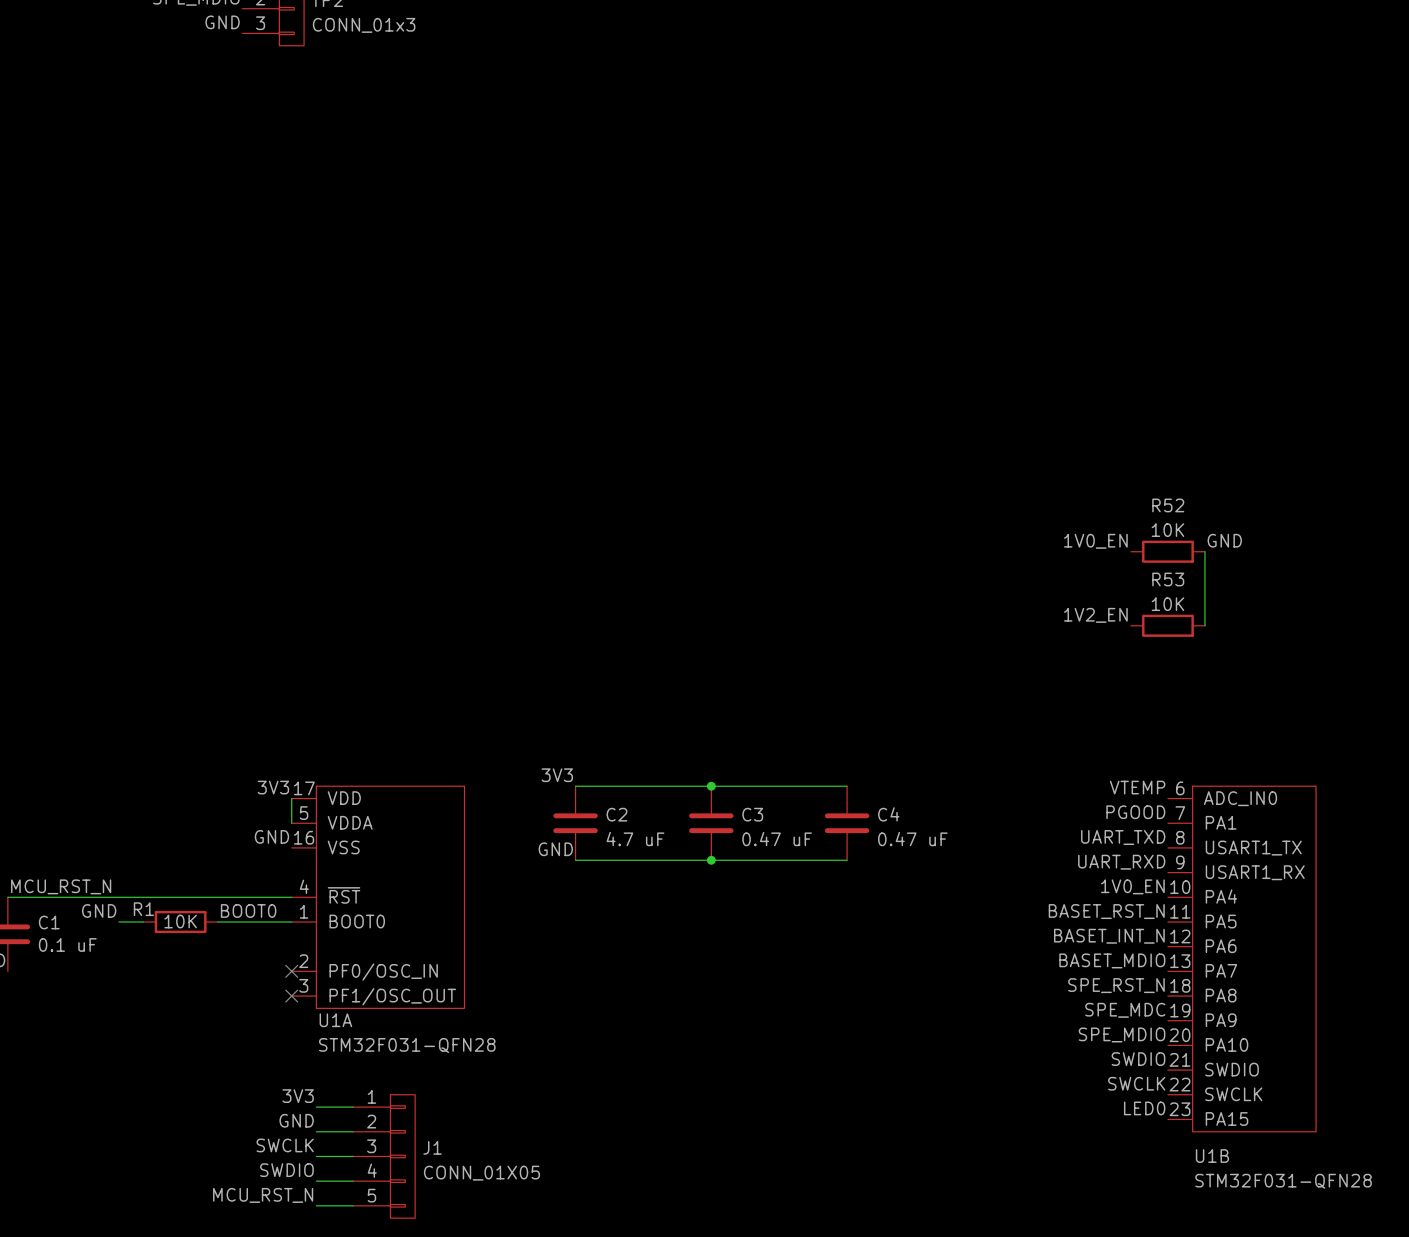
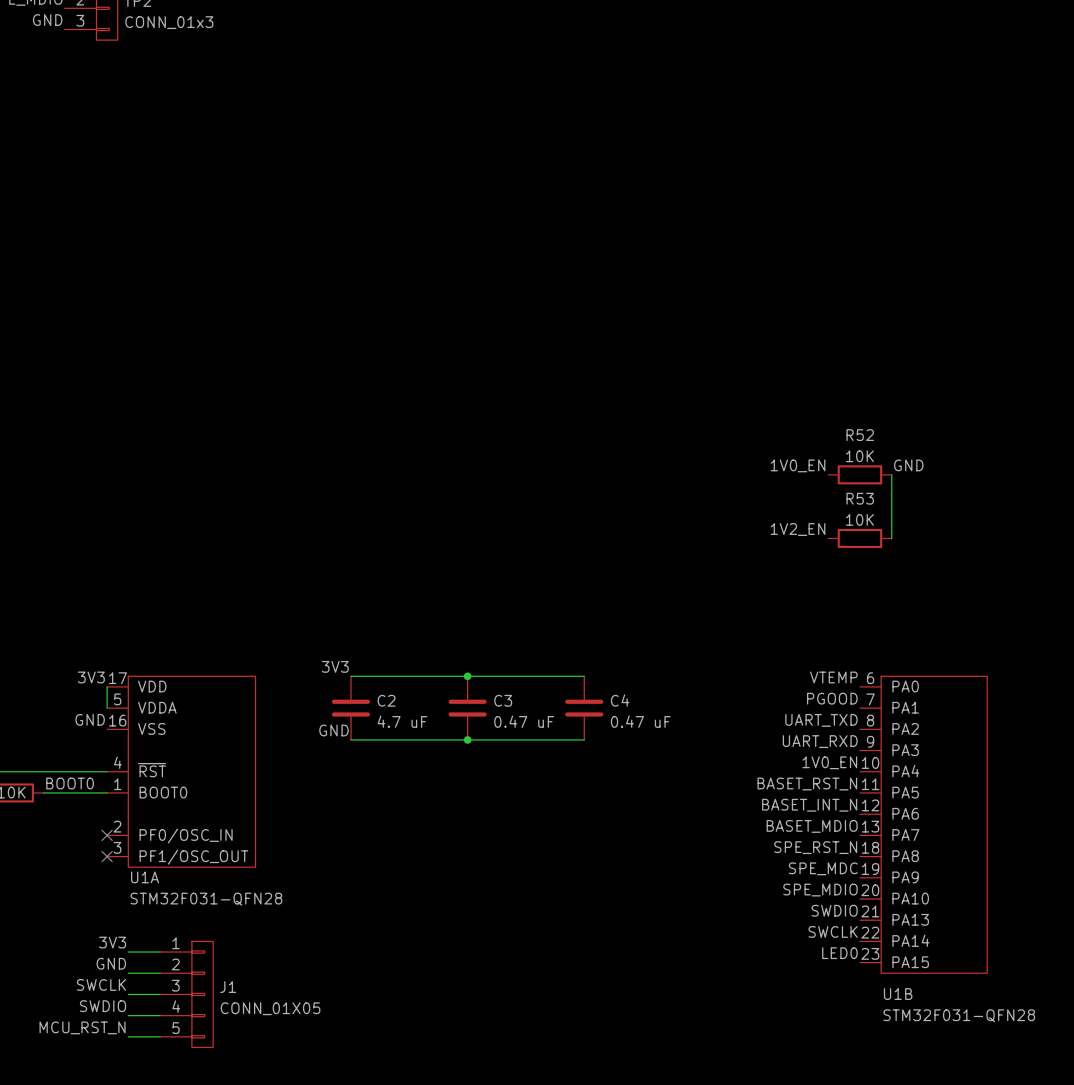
U1B pin name: ADC_IN0 (1240, 798) -> PA0 (905, 686)
U1B pin name: USART1_TX (1253, 848) -> PA2 (905, 728)
U1B pin name: USART1_RX (1255, 872) -> PA3 (905, 750)
U1B pin name: SWDIO (1231, 1069) -> PA13 (910, 919)
U1B pin name: SWCLK (1233, 1094) -> PA14 (910, 940)

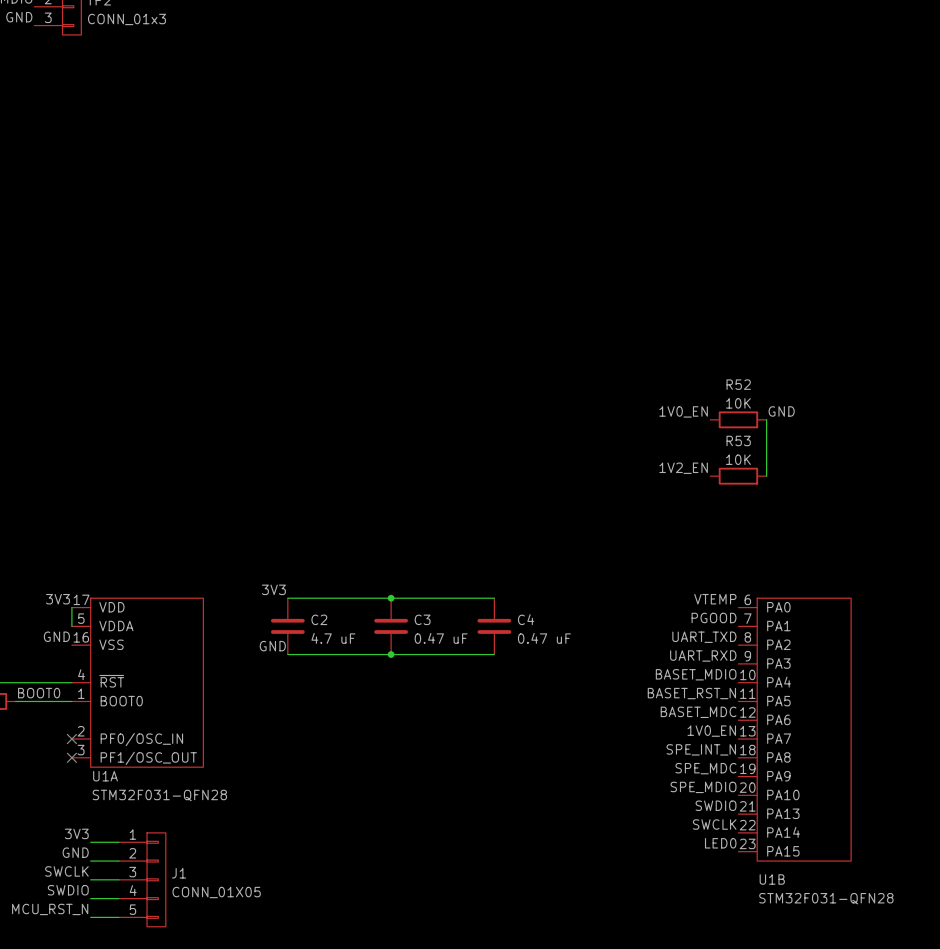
label: 1V0_EN (829, 762) -> BASET_MDIO (696, 674)
label: BASET_INT_N (809, 805) -> BASET_MDC (698, 712)
label: BASET_MDIO (812, 826) -> 1V0_EN (711, 731)
label: SPE_RST_N (815, 847) -> SPE_INT_N (701, 749)

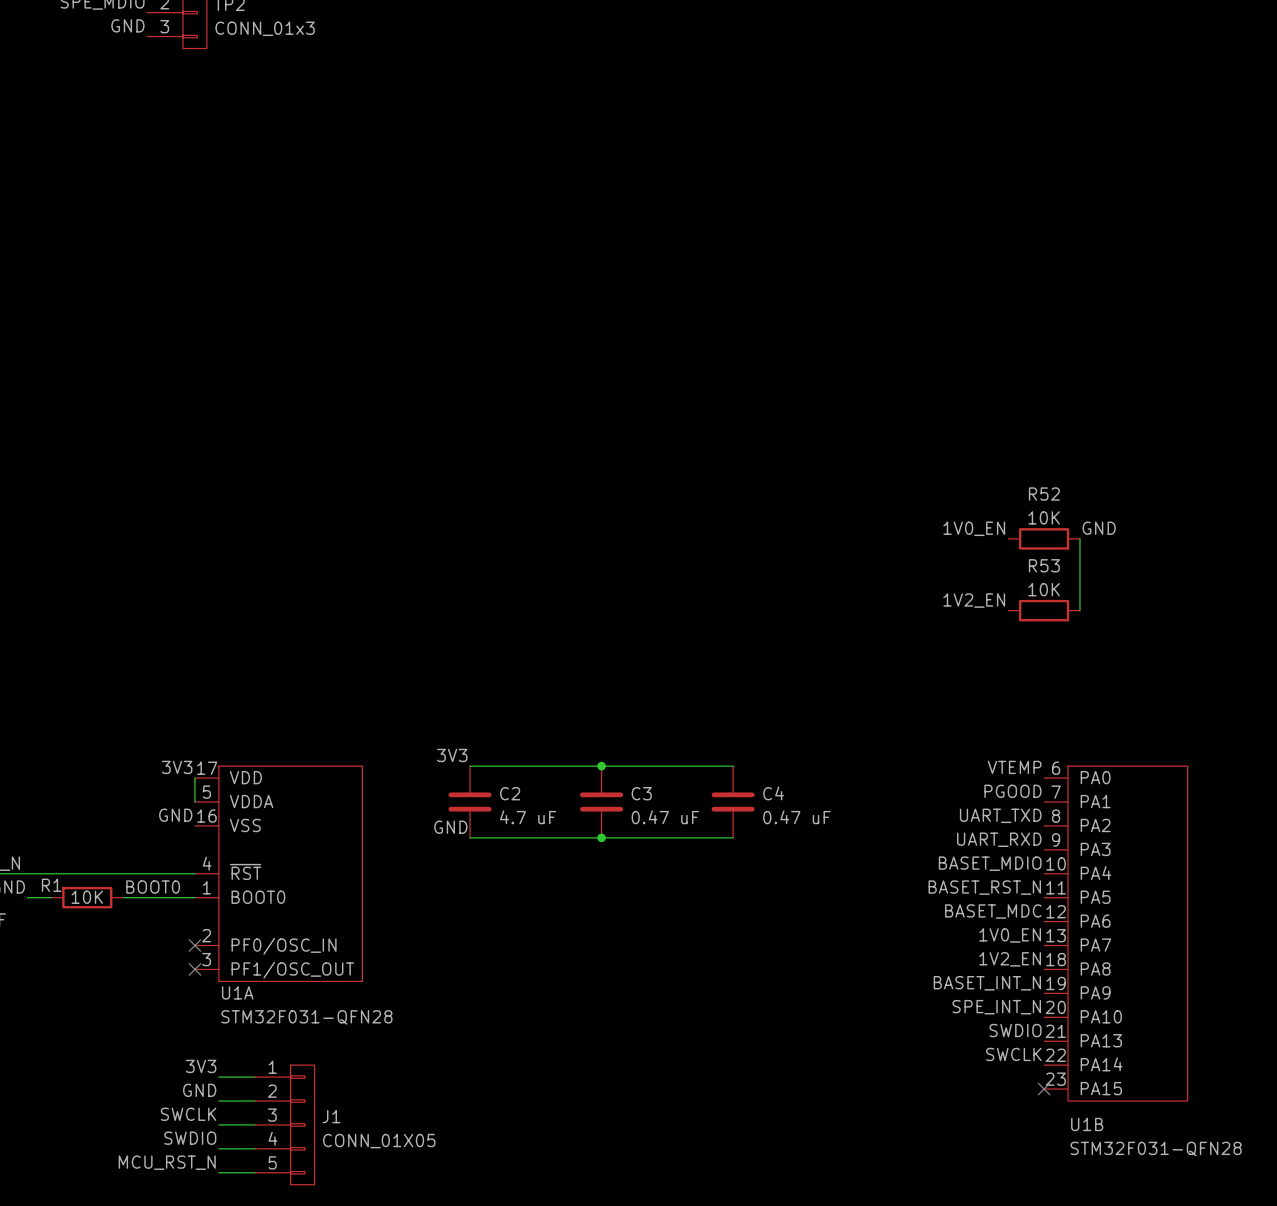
label: SPE_INT_N (701, 749) -> 1V2_EN (1010, 959)
label: SPE_MDC (705, 768) -> BASET_INT_N (987, 983)
label: SPE_MDIO (703, 787) -> SPE_INT_N (996, 1007)
label: LED0 (720, 843) -> none
no-connect mark: none -> (1044, 1089)

